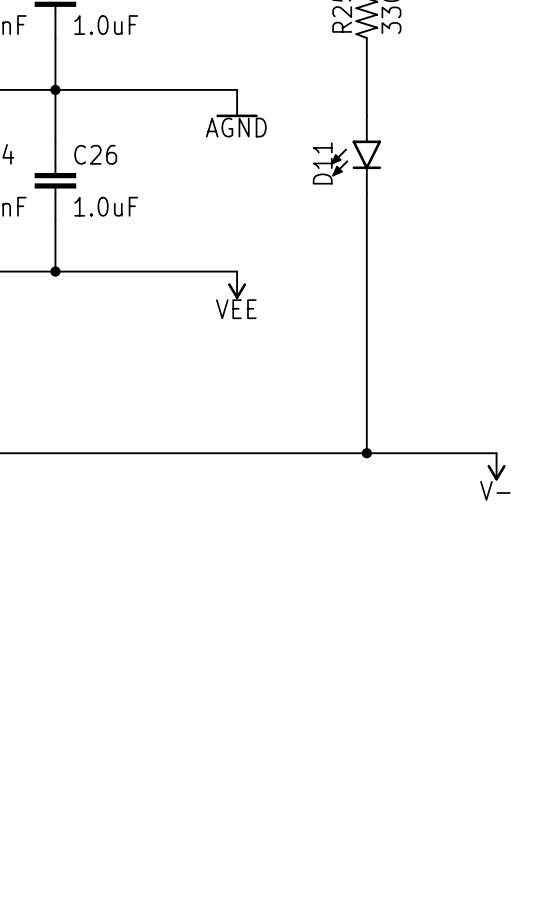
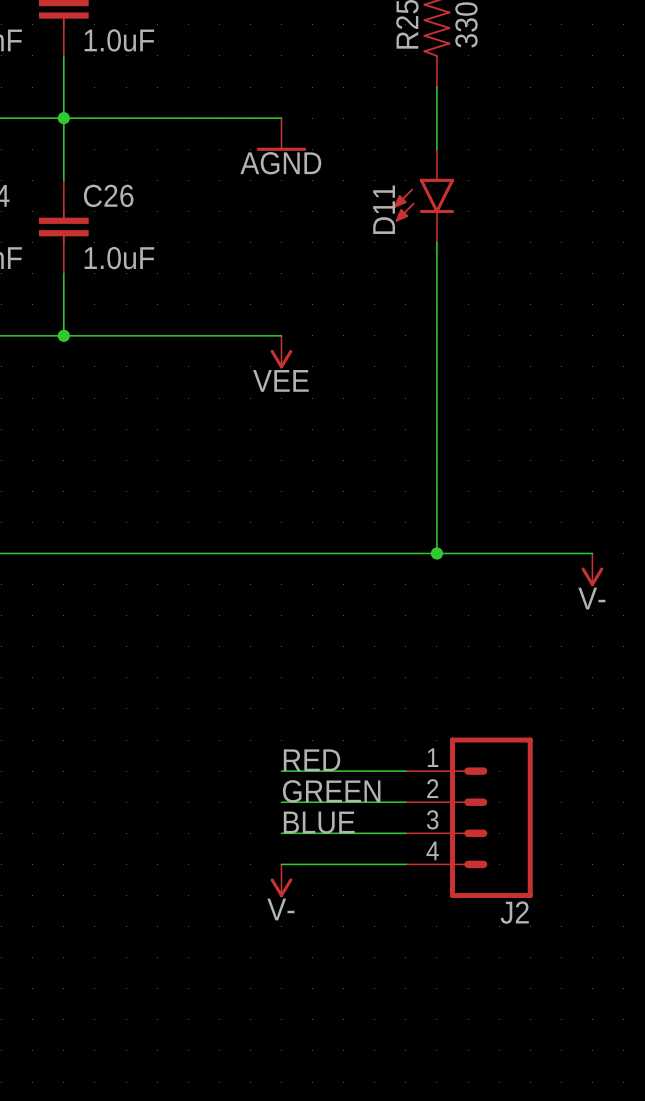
label: none -> RED (312, 760)
wire: none -> (281, 771) (405, 771)
label: none -> GREEN (331, 791)
wire: none -> (281, 802) (405, 802)
J2: none -> (469, 817)
label: none -> BLUE (319, 822)
wire: none -> (281, 833) (405, 833)
wire: none -> (281, 864) (405, 864)
power symbol: none -> V- (281, 880)

